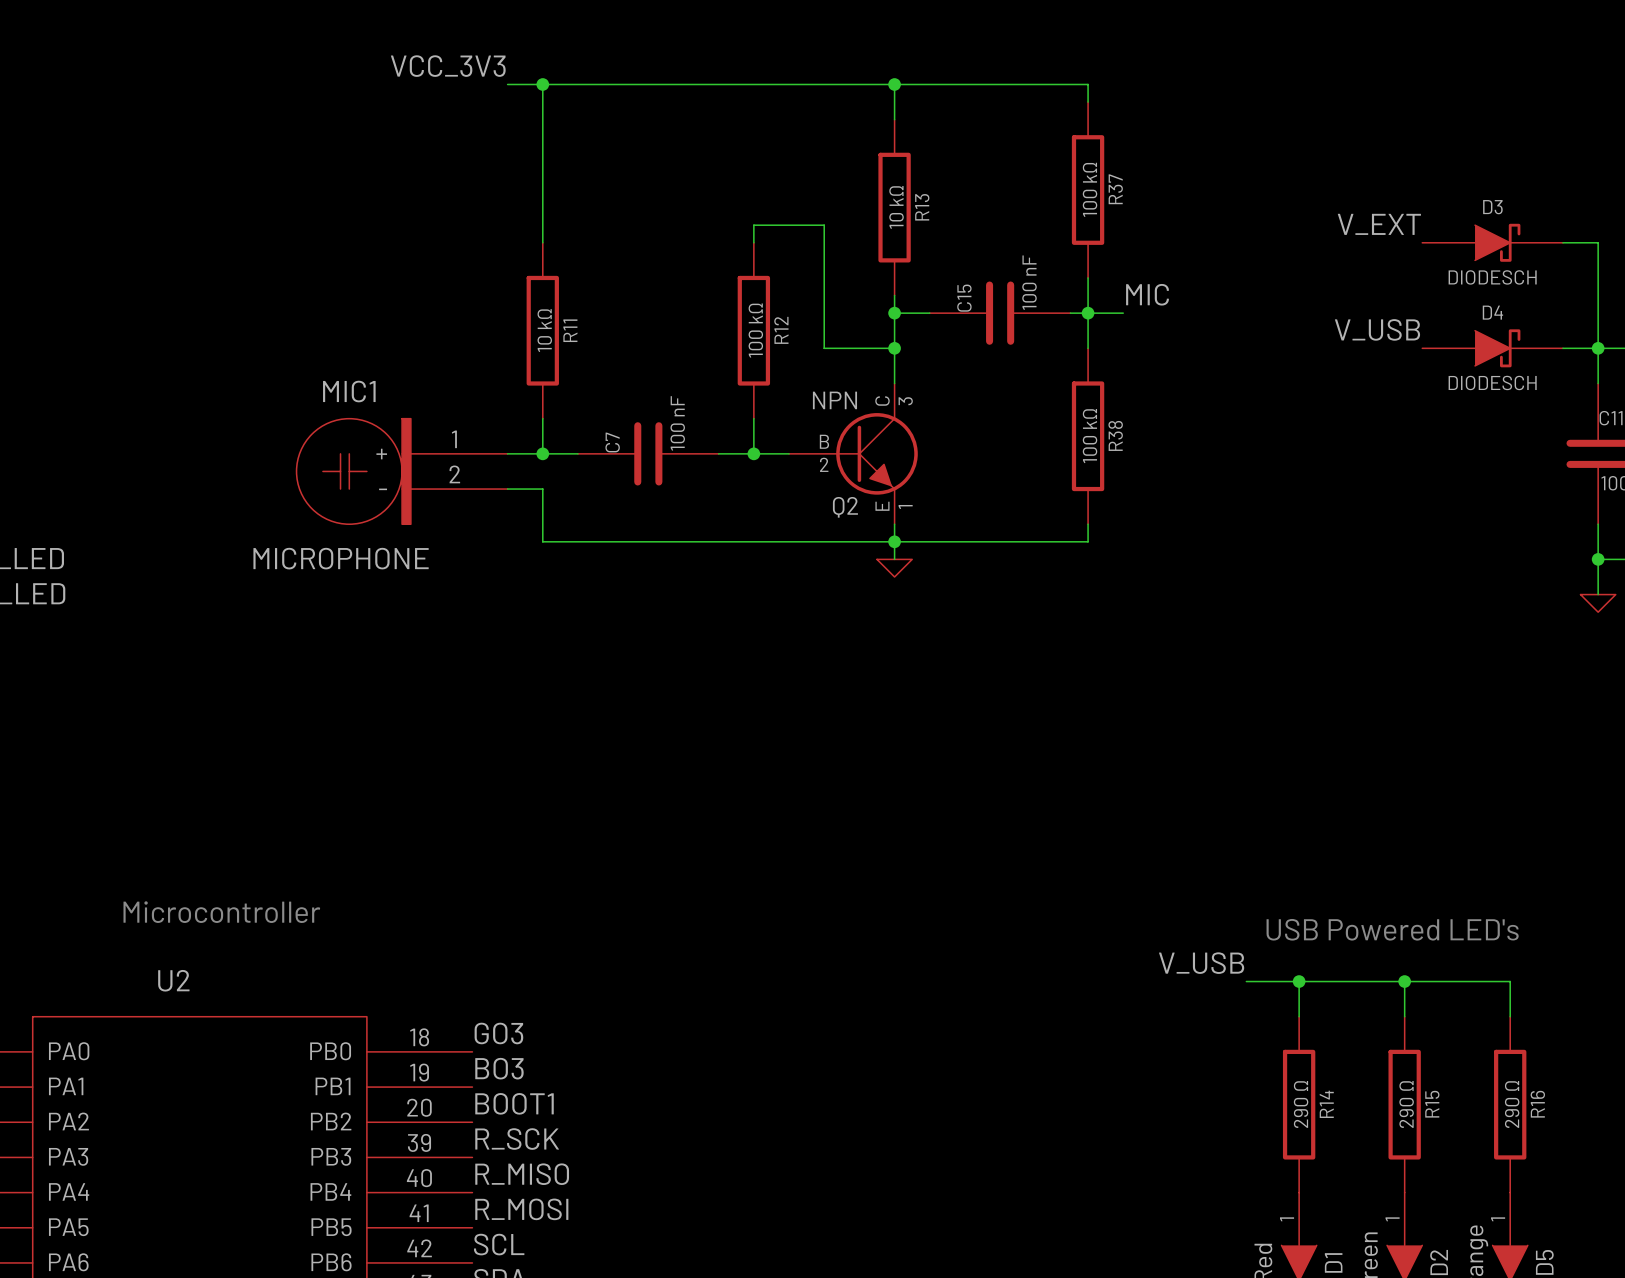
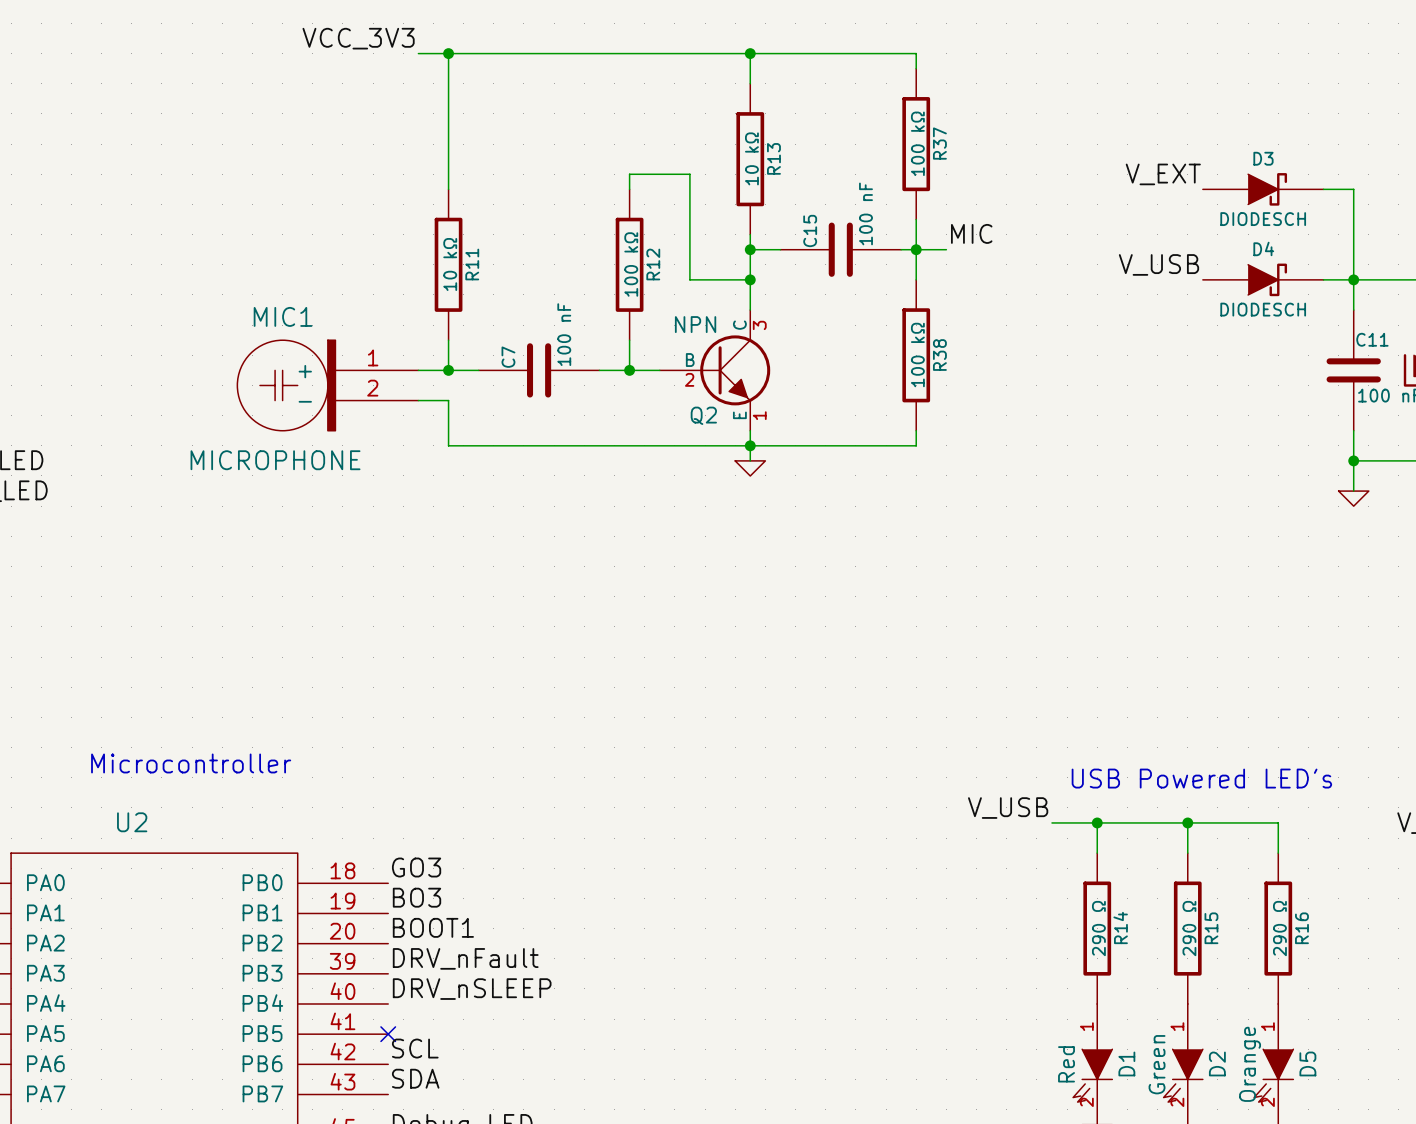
label: R_SCK (517, 1139) -> DRV_nFault (465, 958)
label: R_MISO (522, 1174) -> DRV_nSLEEP (472, 989)
label: R_MOSI (521, 1209) -> none
no-connect mark: none -> (388, 1034)

